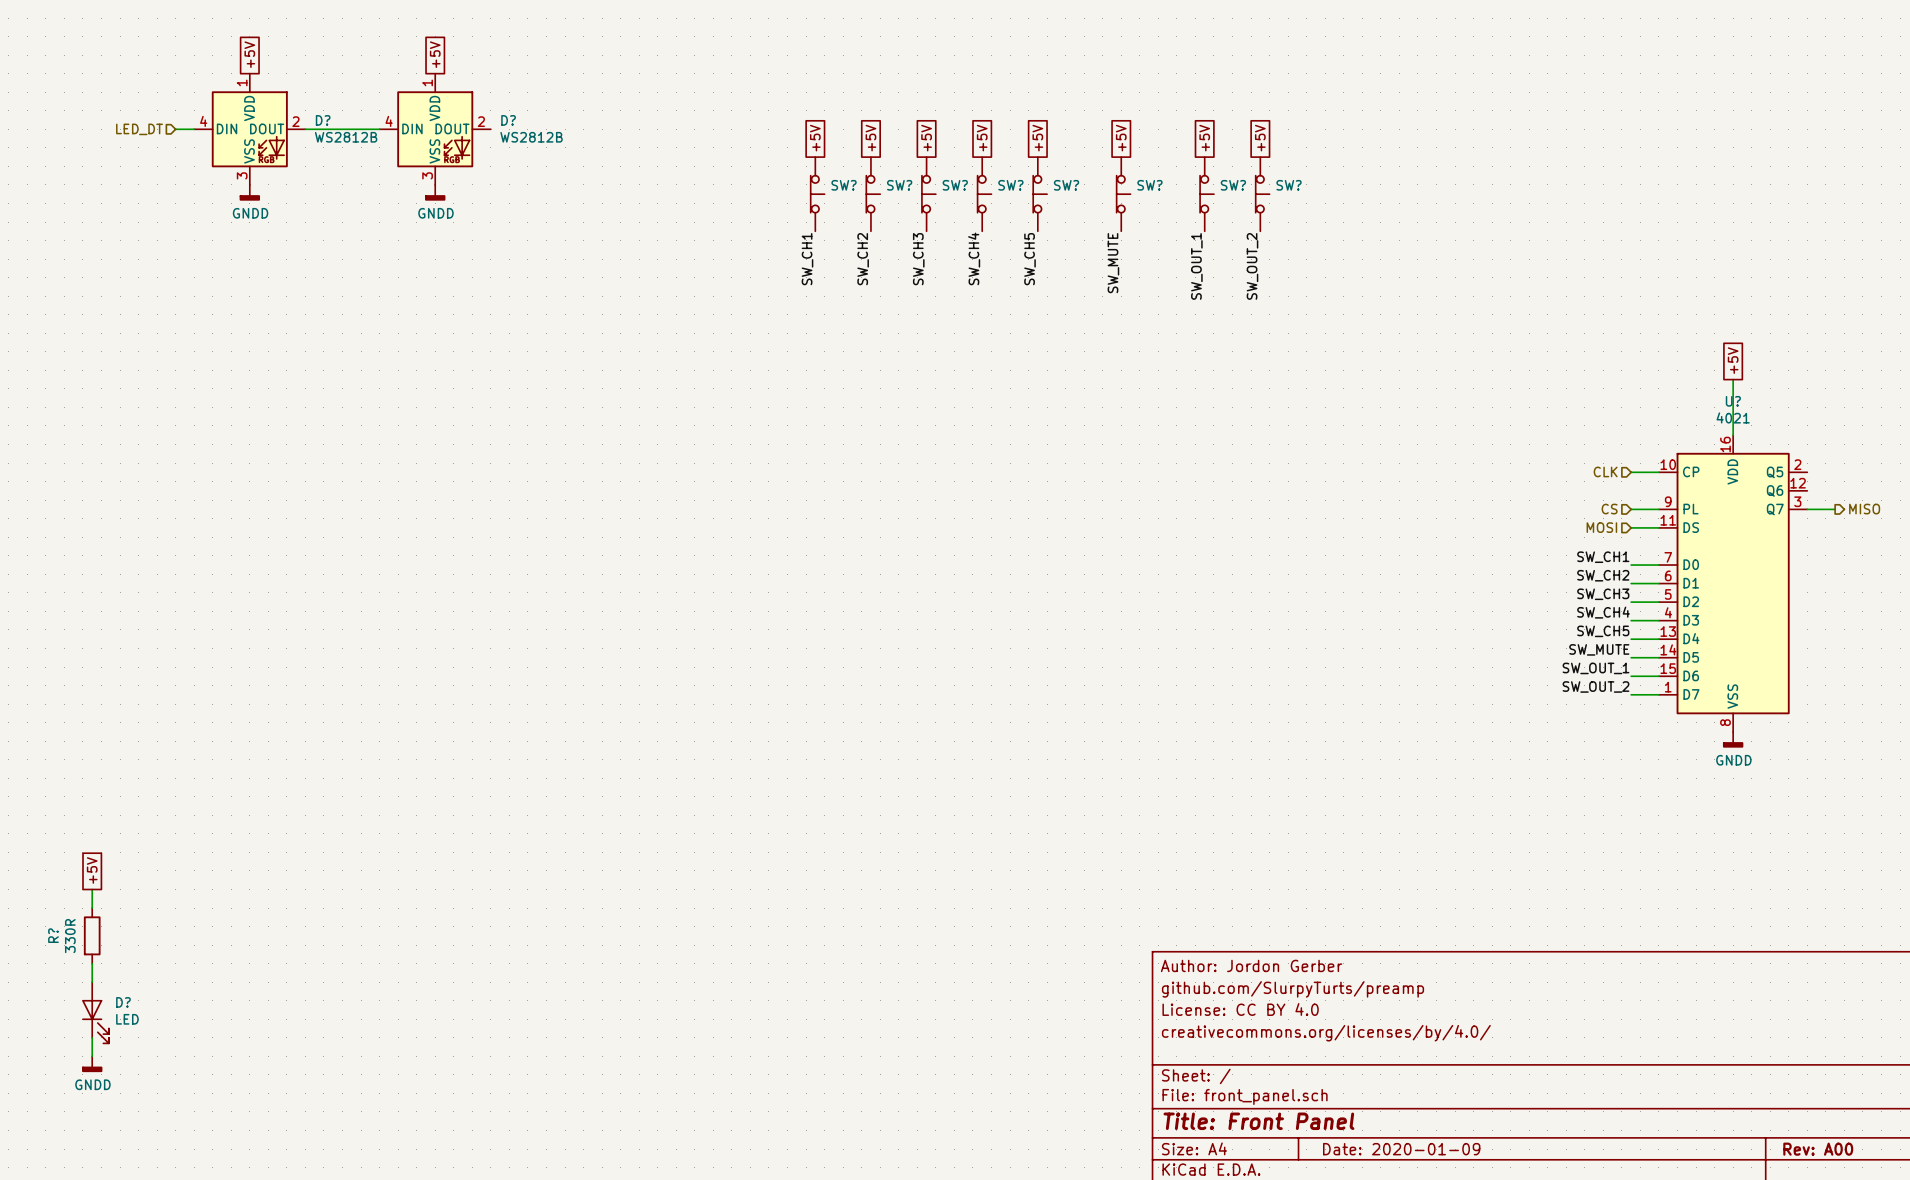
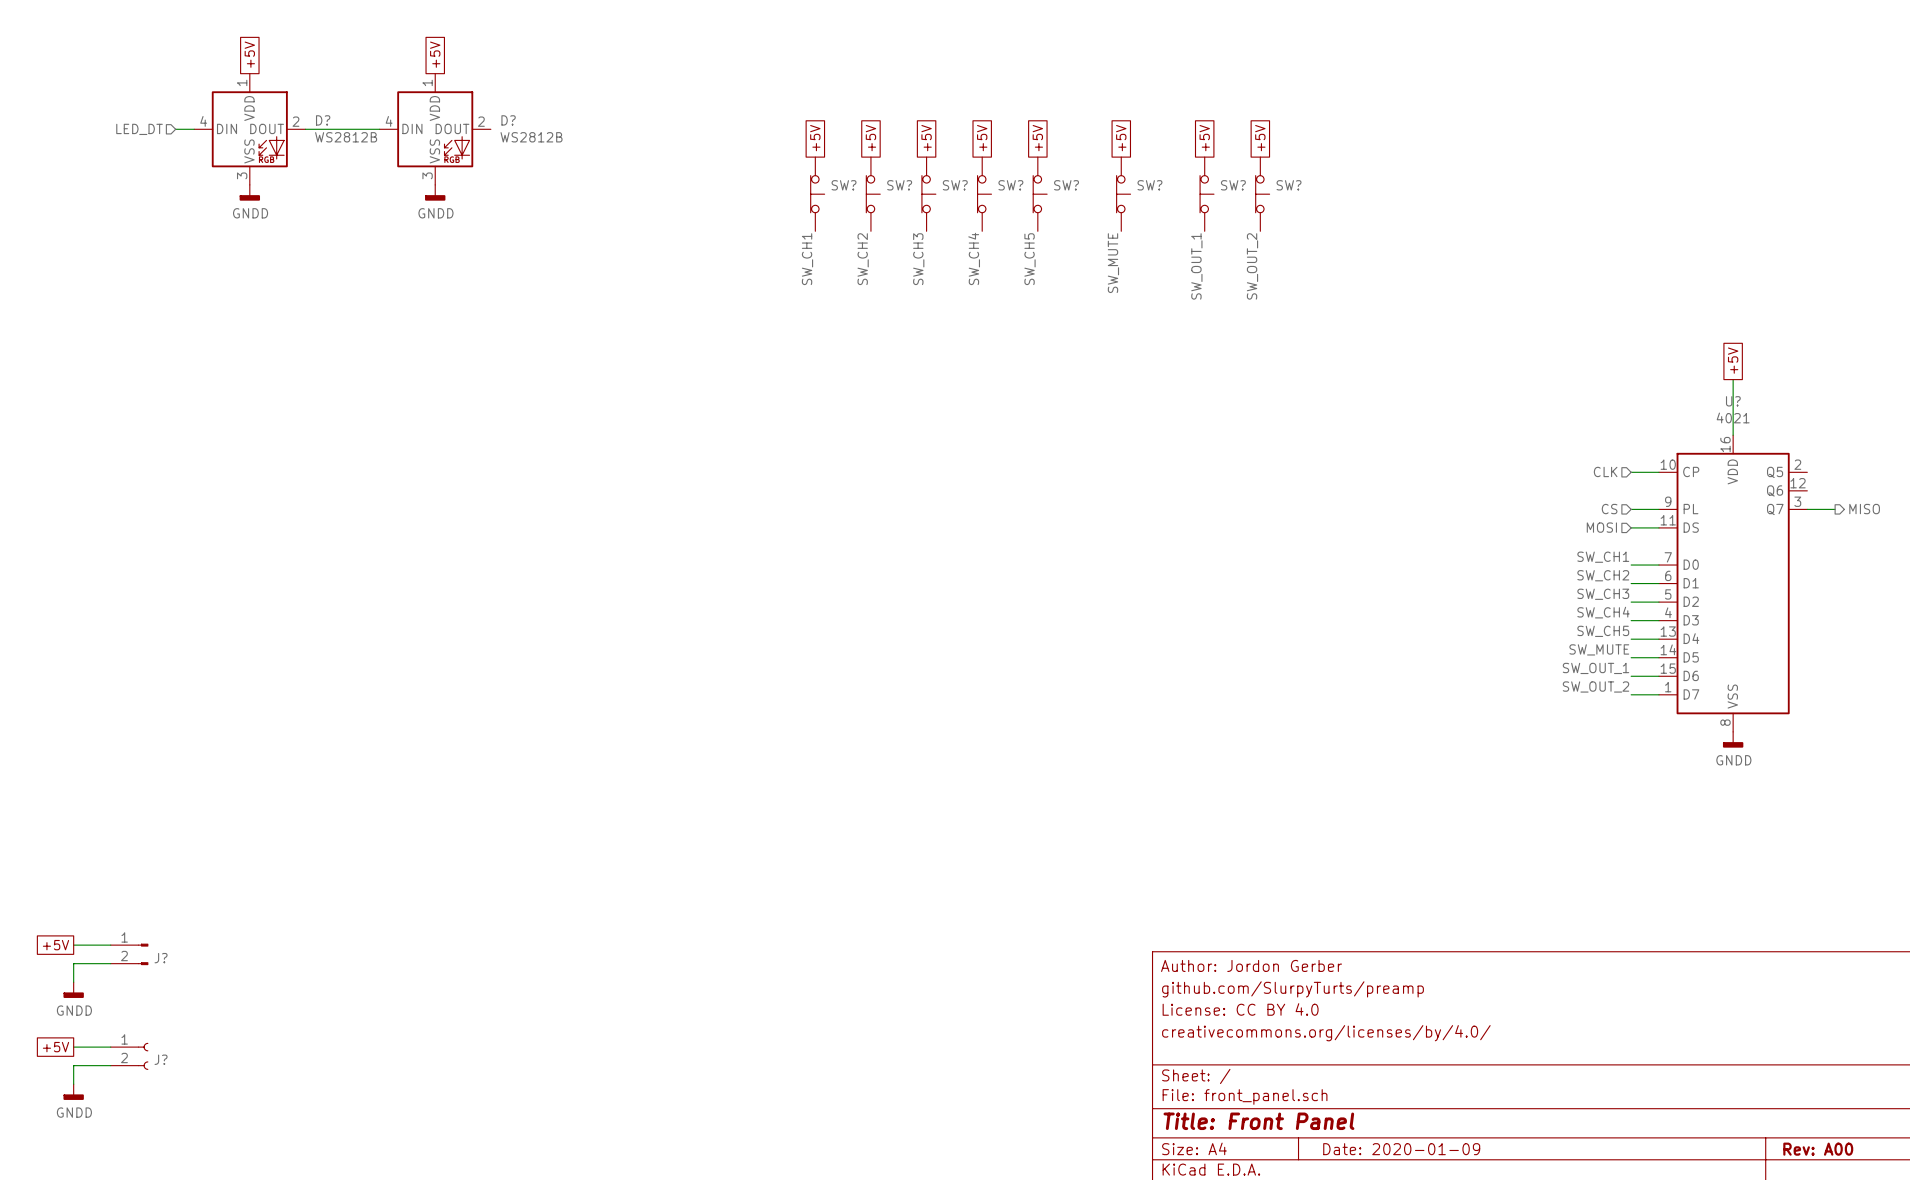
global label rotation: 0° (92, 870) -> 90° counterclockwise (55, 945)
global label position: +5V (92, 870) -> +5V (55, 945)
wire: (92, 889) (92, 908) -> none
R?: 330R (92, 935) -> none
wire: none -> (73, 945) (110, 945)
J?: none -> (129, 954)
wire: (92, 963) (92, 982) -> none
wire: none -> (110, 963) (73, 963) (73, 982)
power symbol: none -> GNDD (73, 990)
D?: LED (95, 1012) -> none
wire: (92, 1037) (92, 1056) -> none
global label: none -> +5V (55, 1047)
wire: none -> (73, 1047) (110, 1047)
J?: none -> (129, 1056)
power symbol position: GNDD (92, 1064) -> GNDD (73, 1092)
wire: none -> (110, 1065) (73, 1065) (73, 1084)

